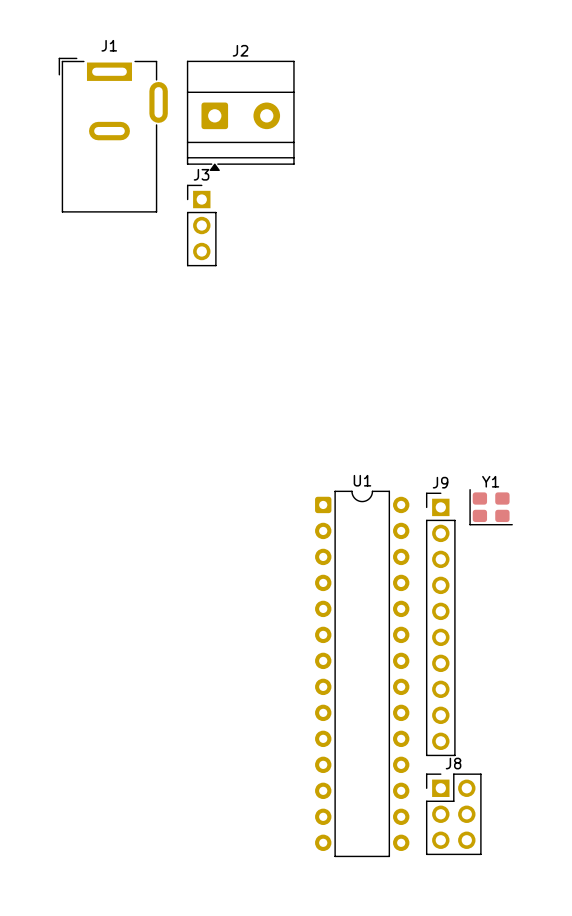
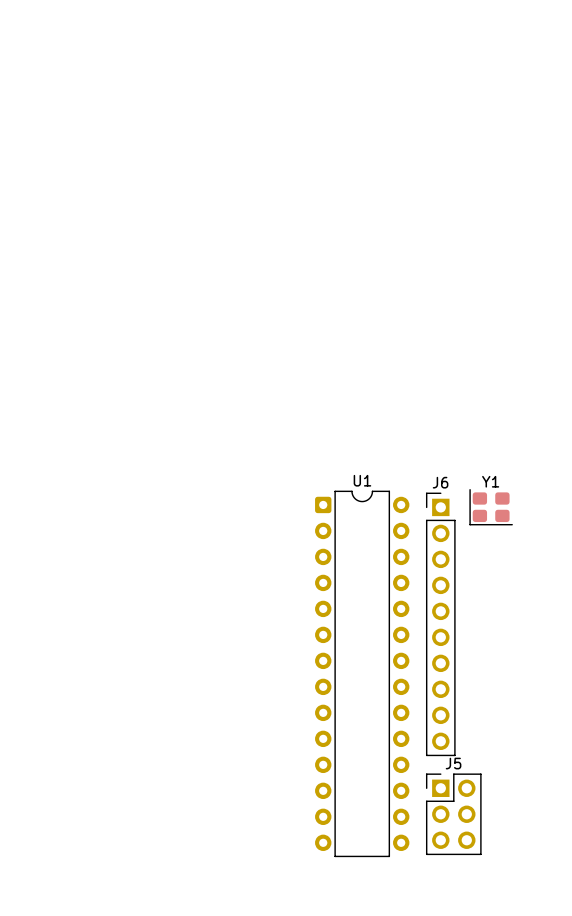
J2: (240, 115) -> none
J1: (113, 135) -> none
J3: (201, 225) -> none
J9 name: J9 (440, 482) -> J6 (440, 482)
J8 name: J8 (453, 763) -> J5 (453, 763)

